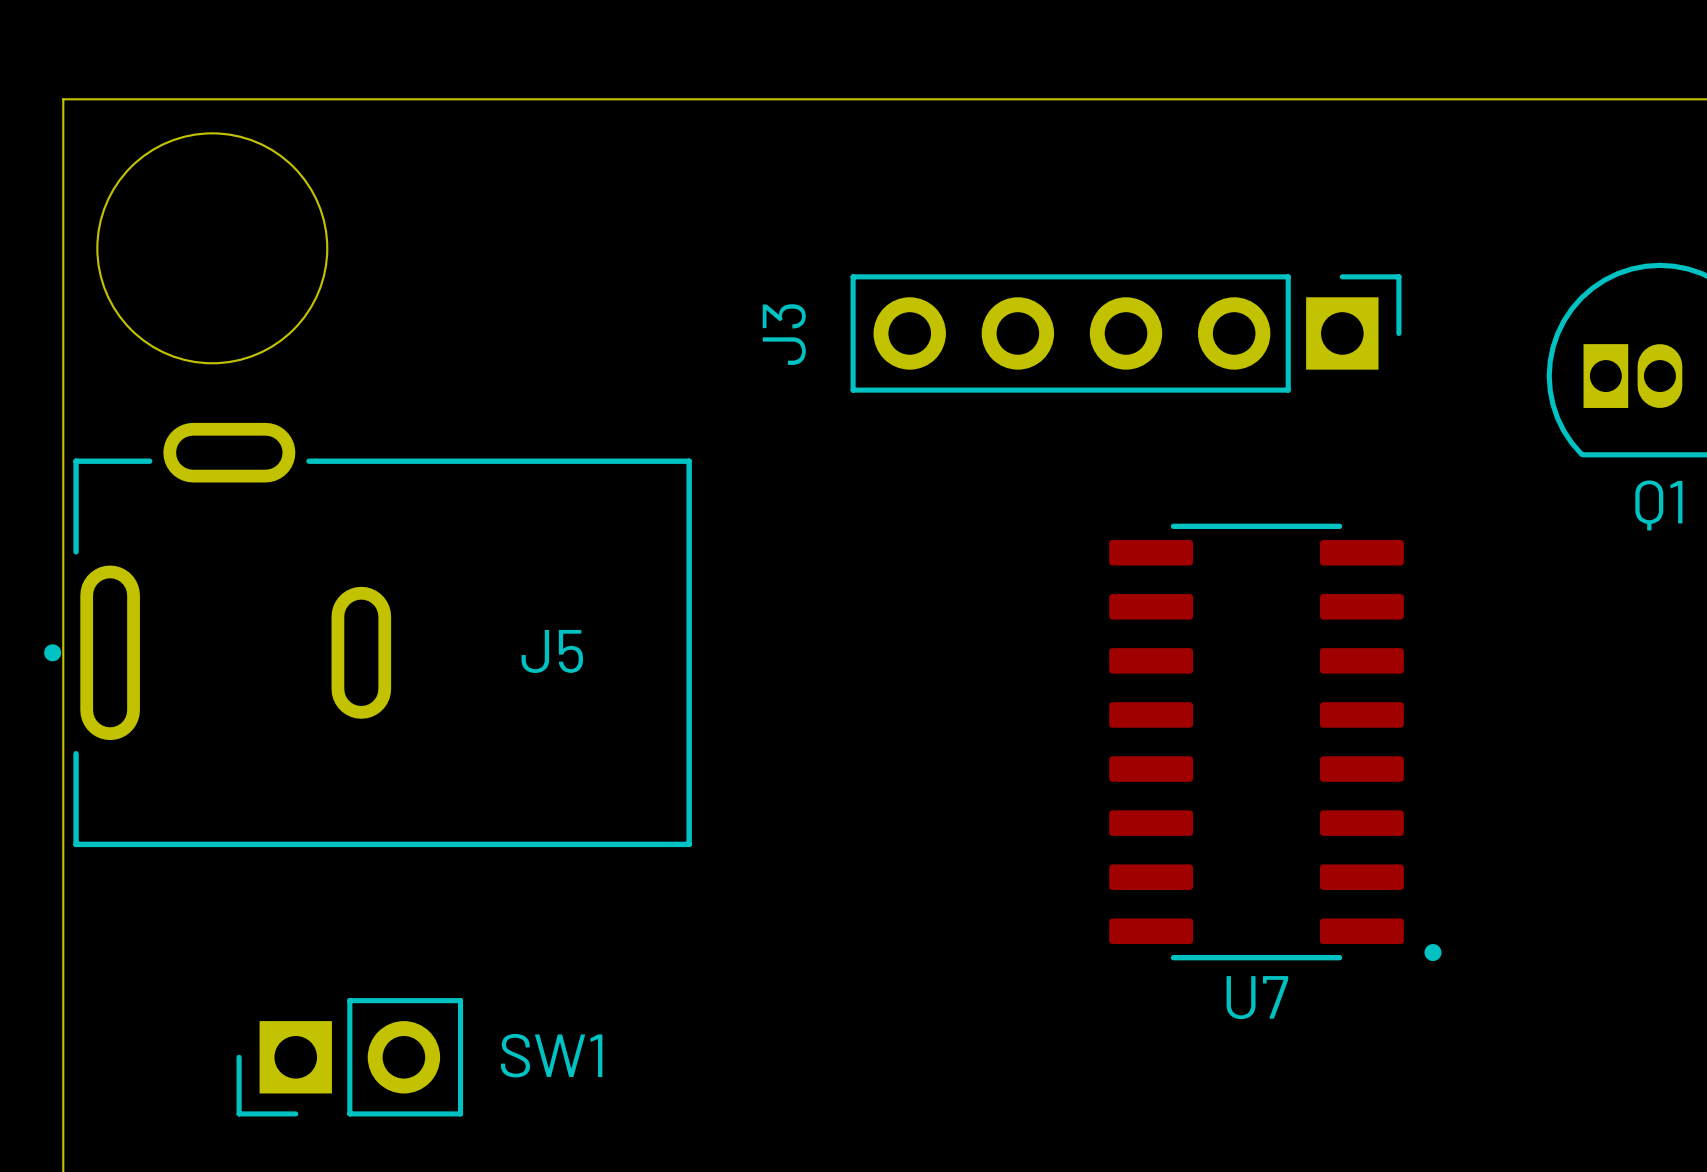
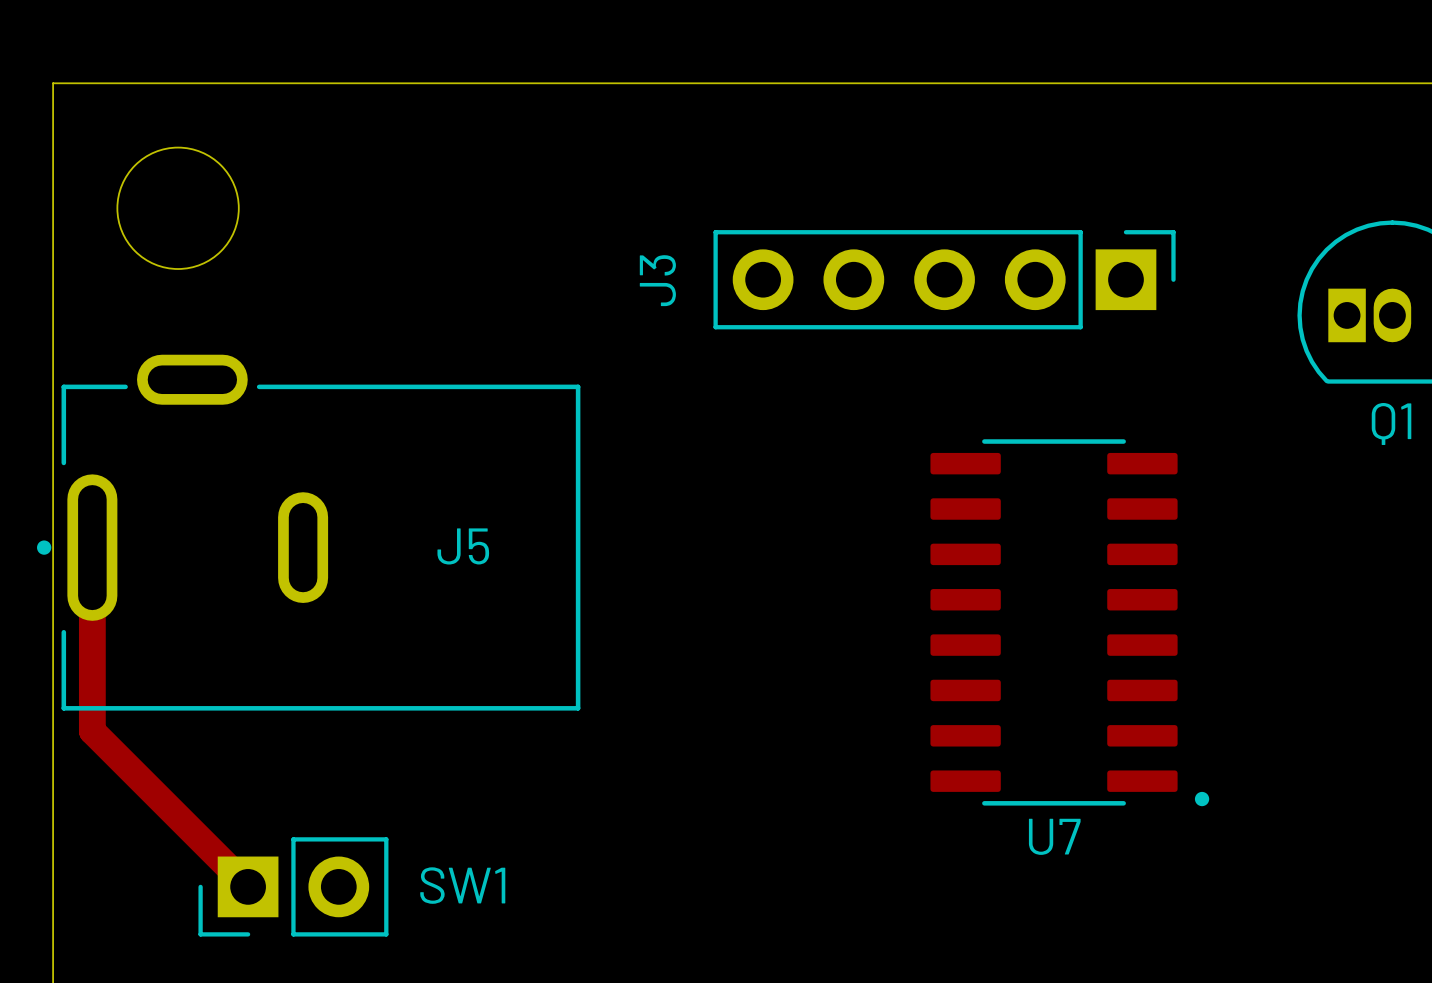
round board edge size: [96, 132, 329, 365] -> [116, 146, 240, 270]
top track: none -> (92, 547) (92, 731) (248, 886)

